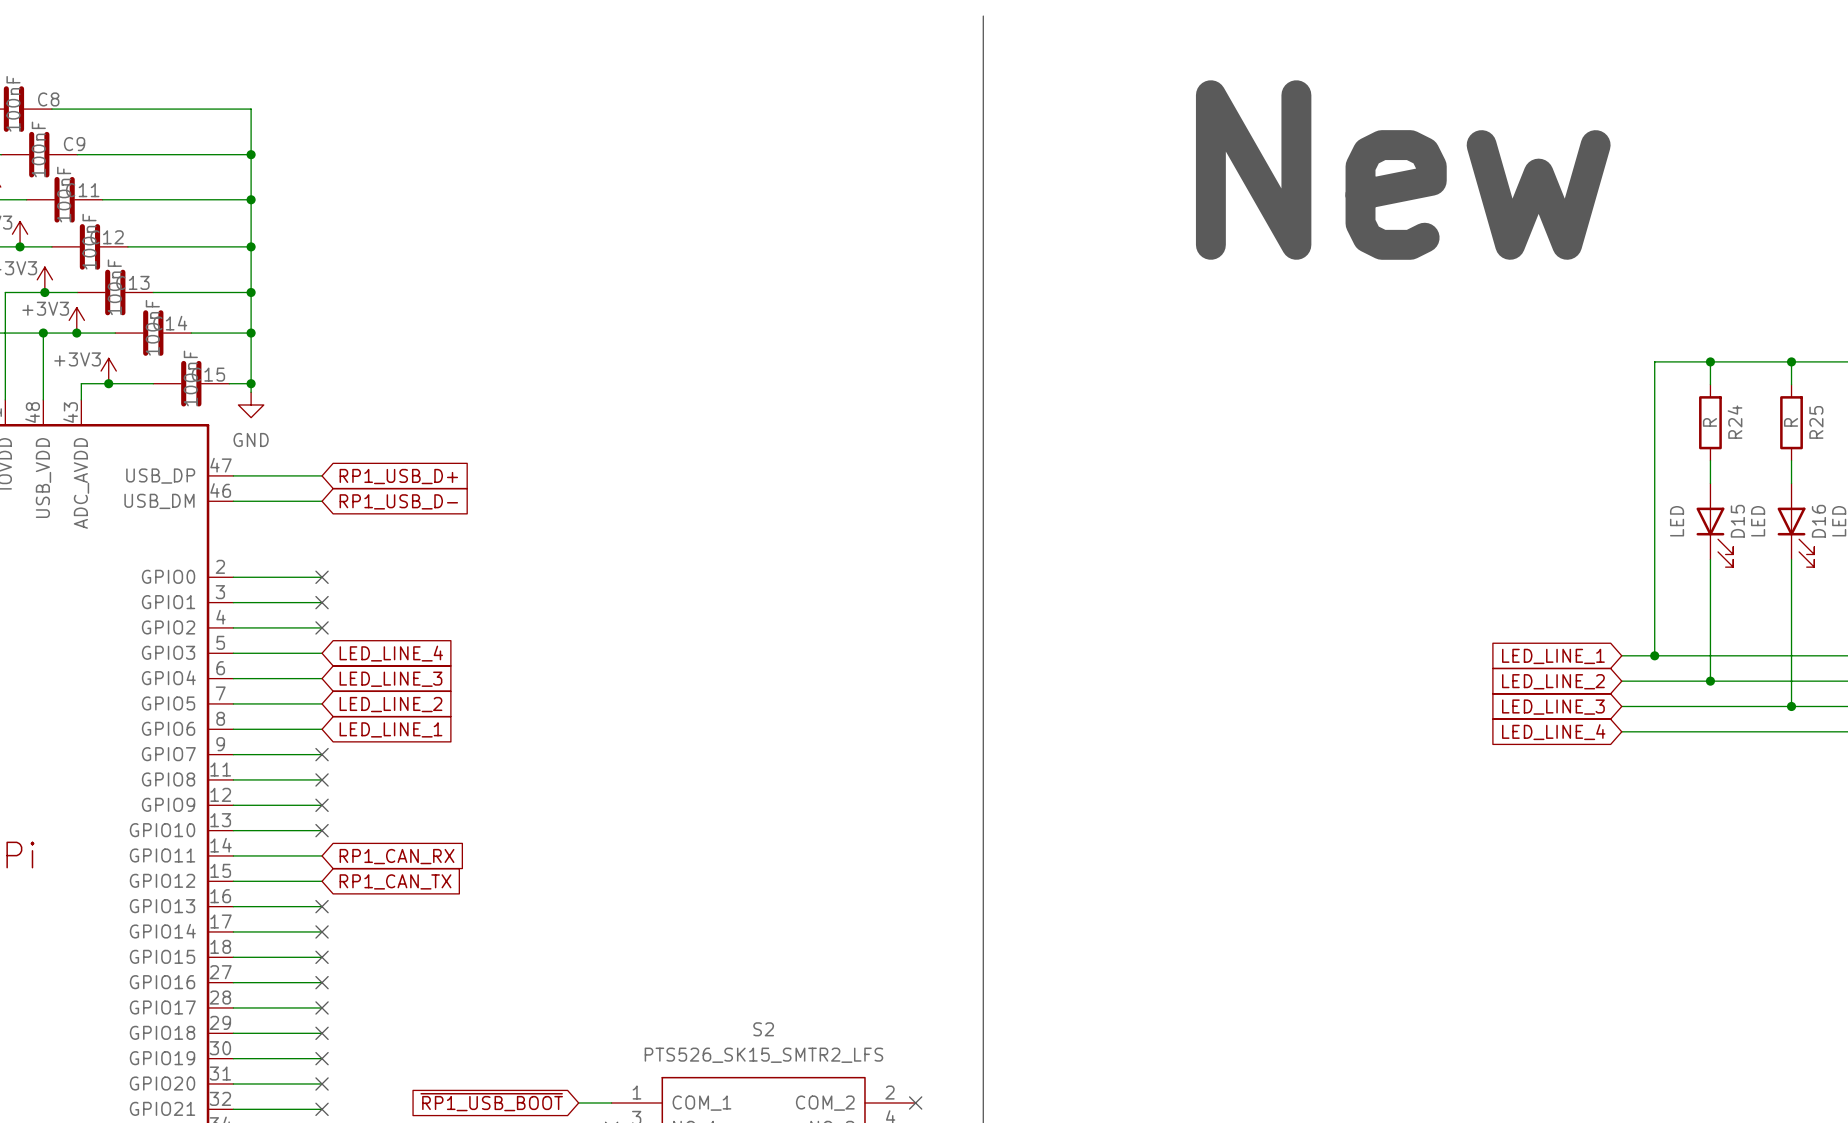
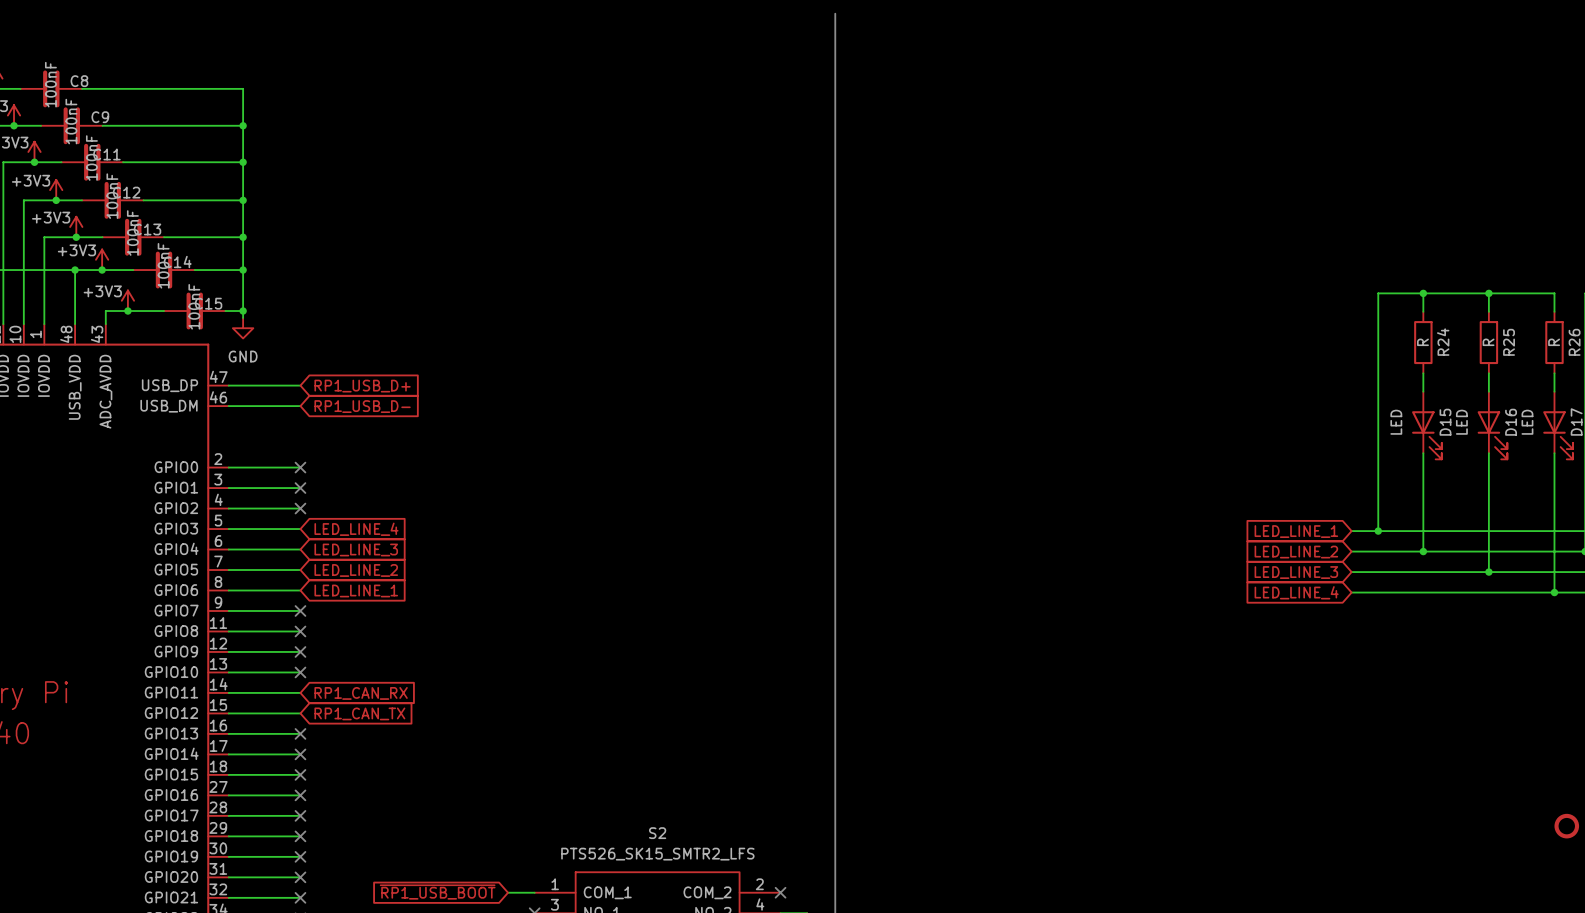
text: New (1403, 170) -> none

